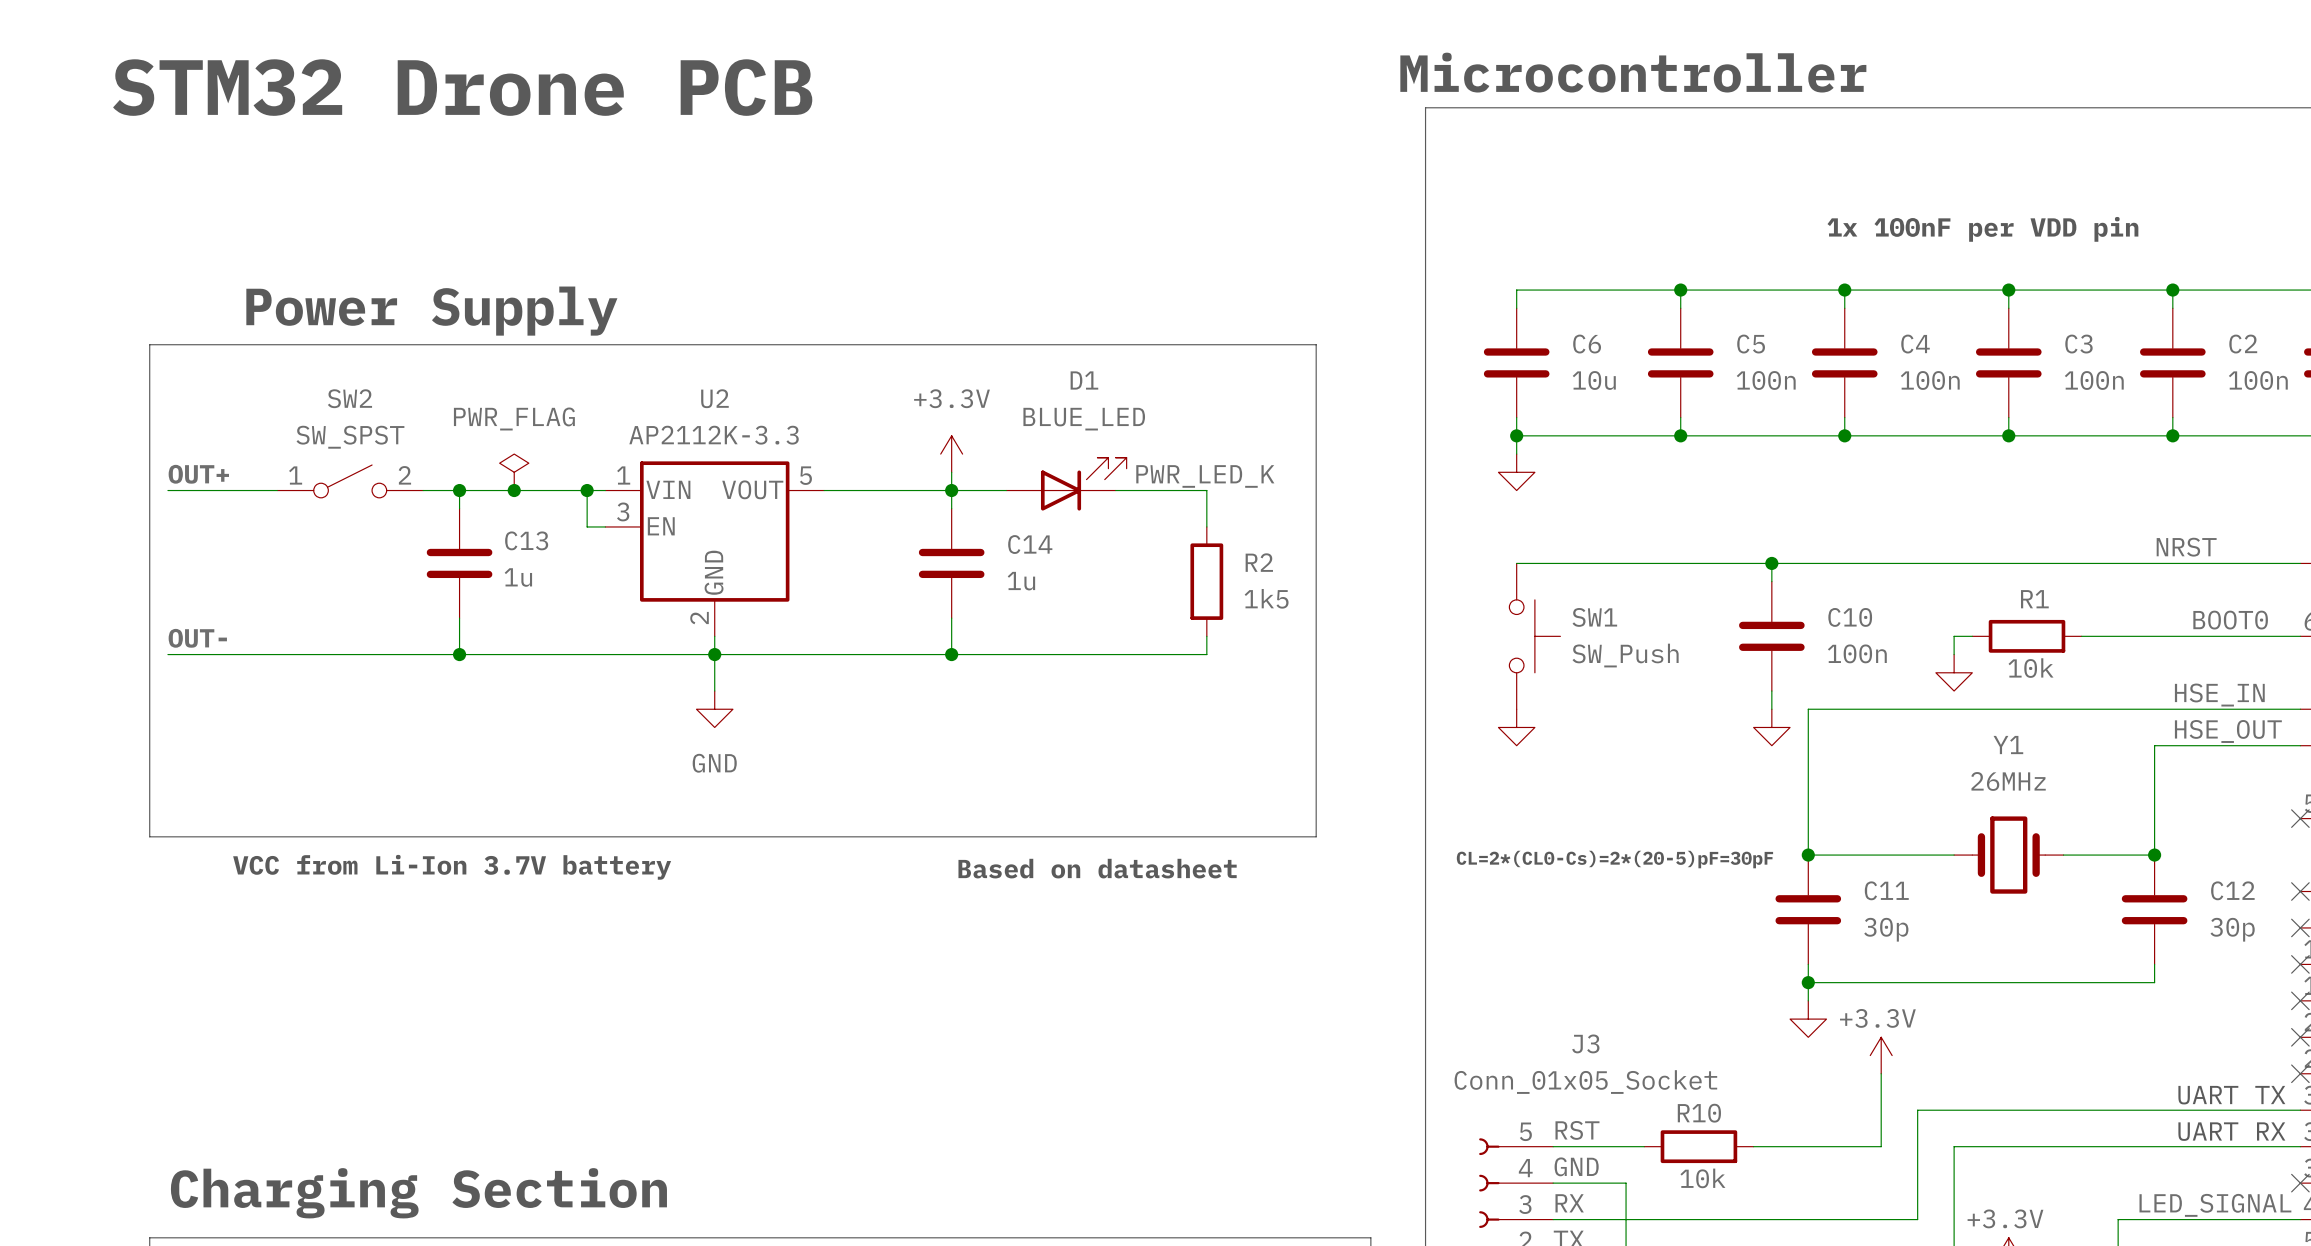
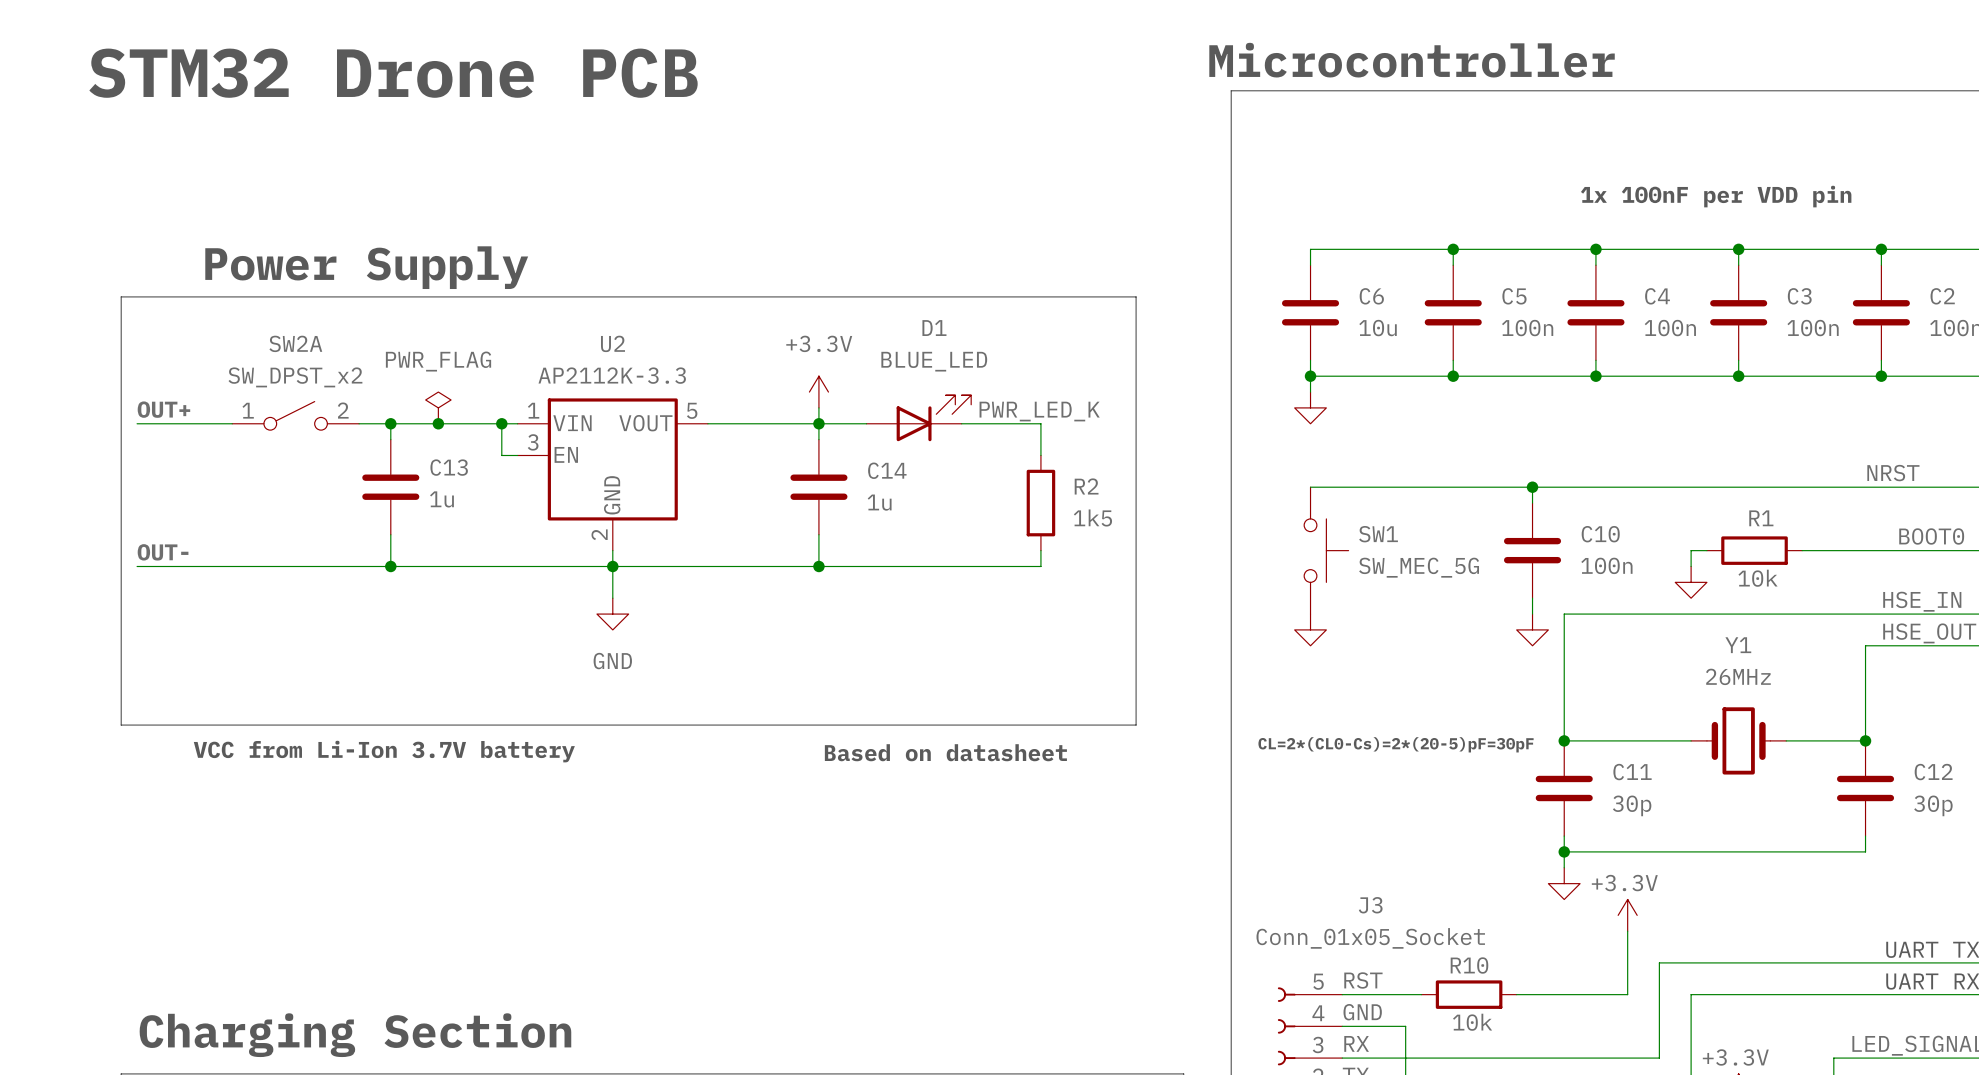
SW2 name: SW2 (349, 398) -> SW2A (295, 343)
SW2 value: SW_SPST (350, 437) -> SW_DPST_x2 (295, 377)
SW1 value: SW_Push (1625, 655) -> SW_MEC_5G (1419, 567)

